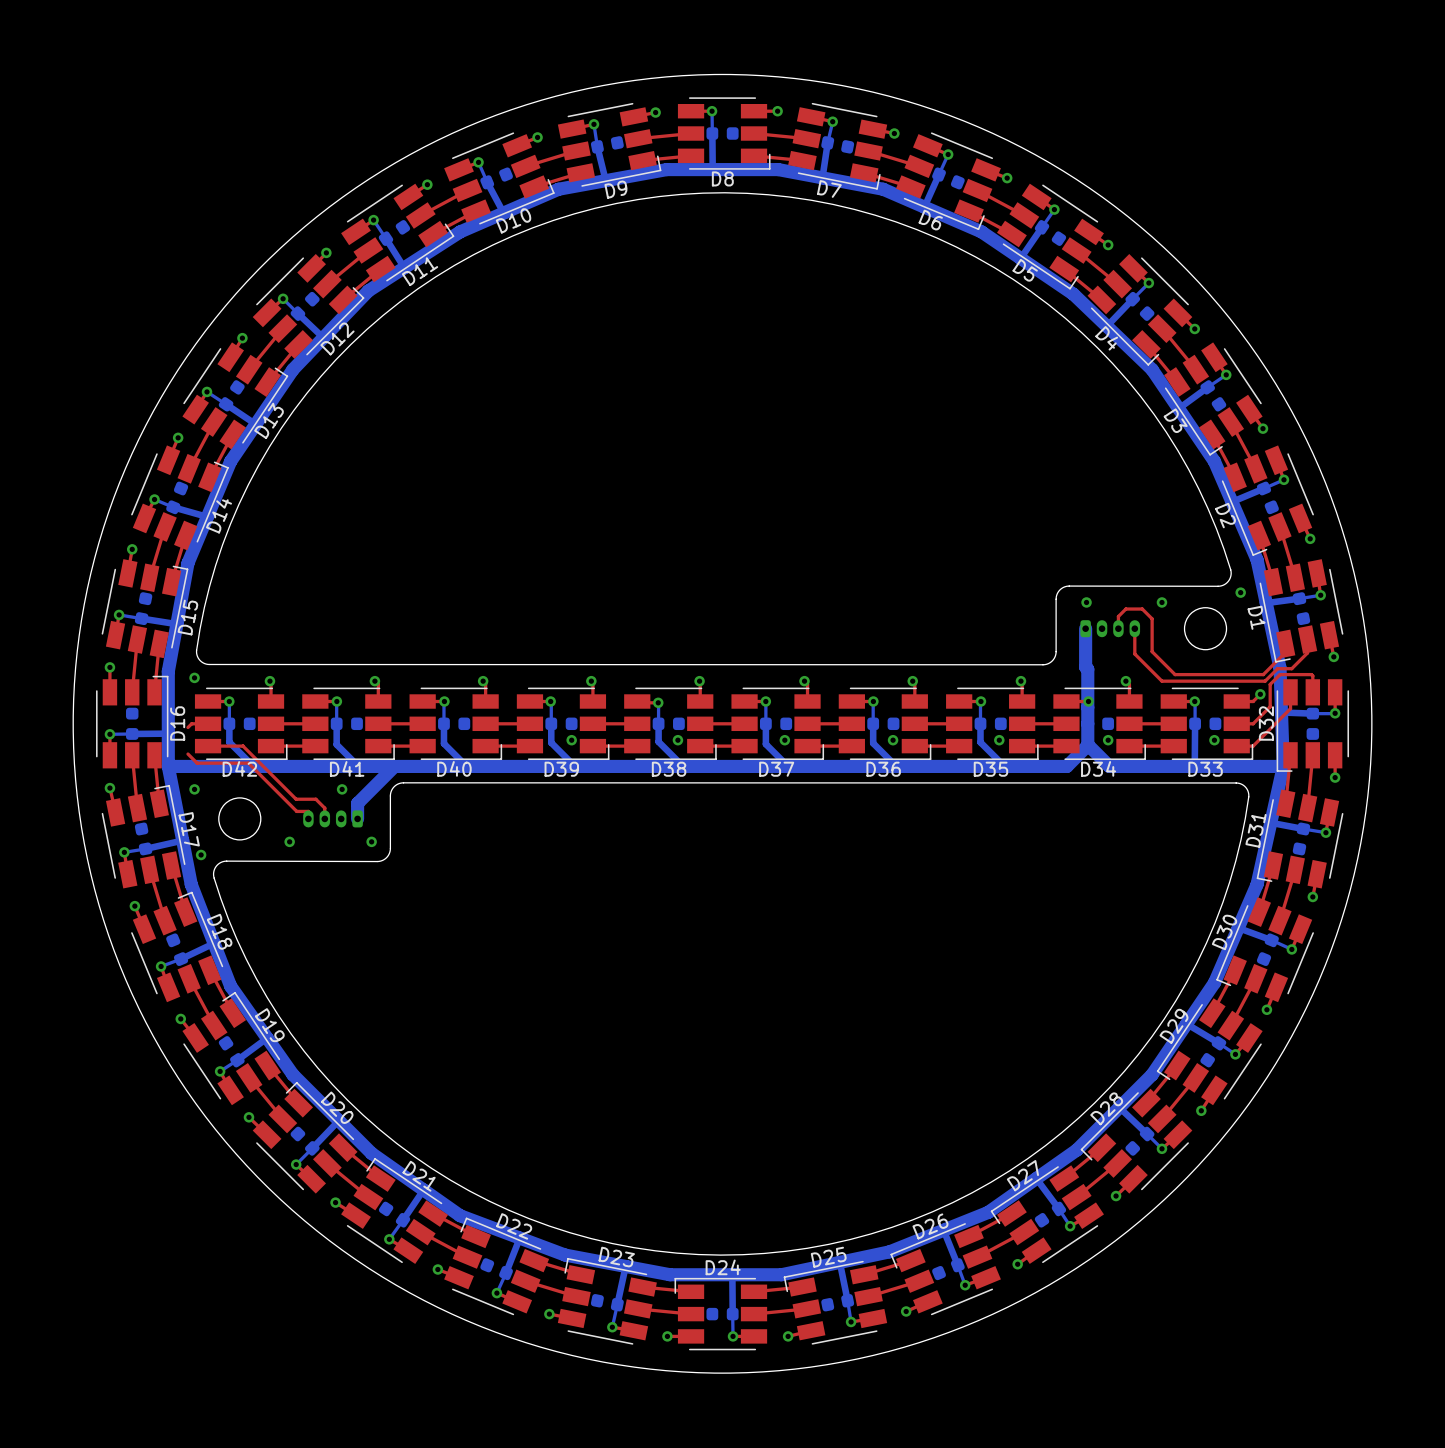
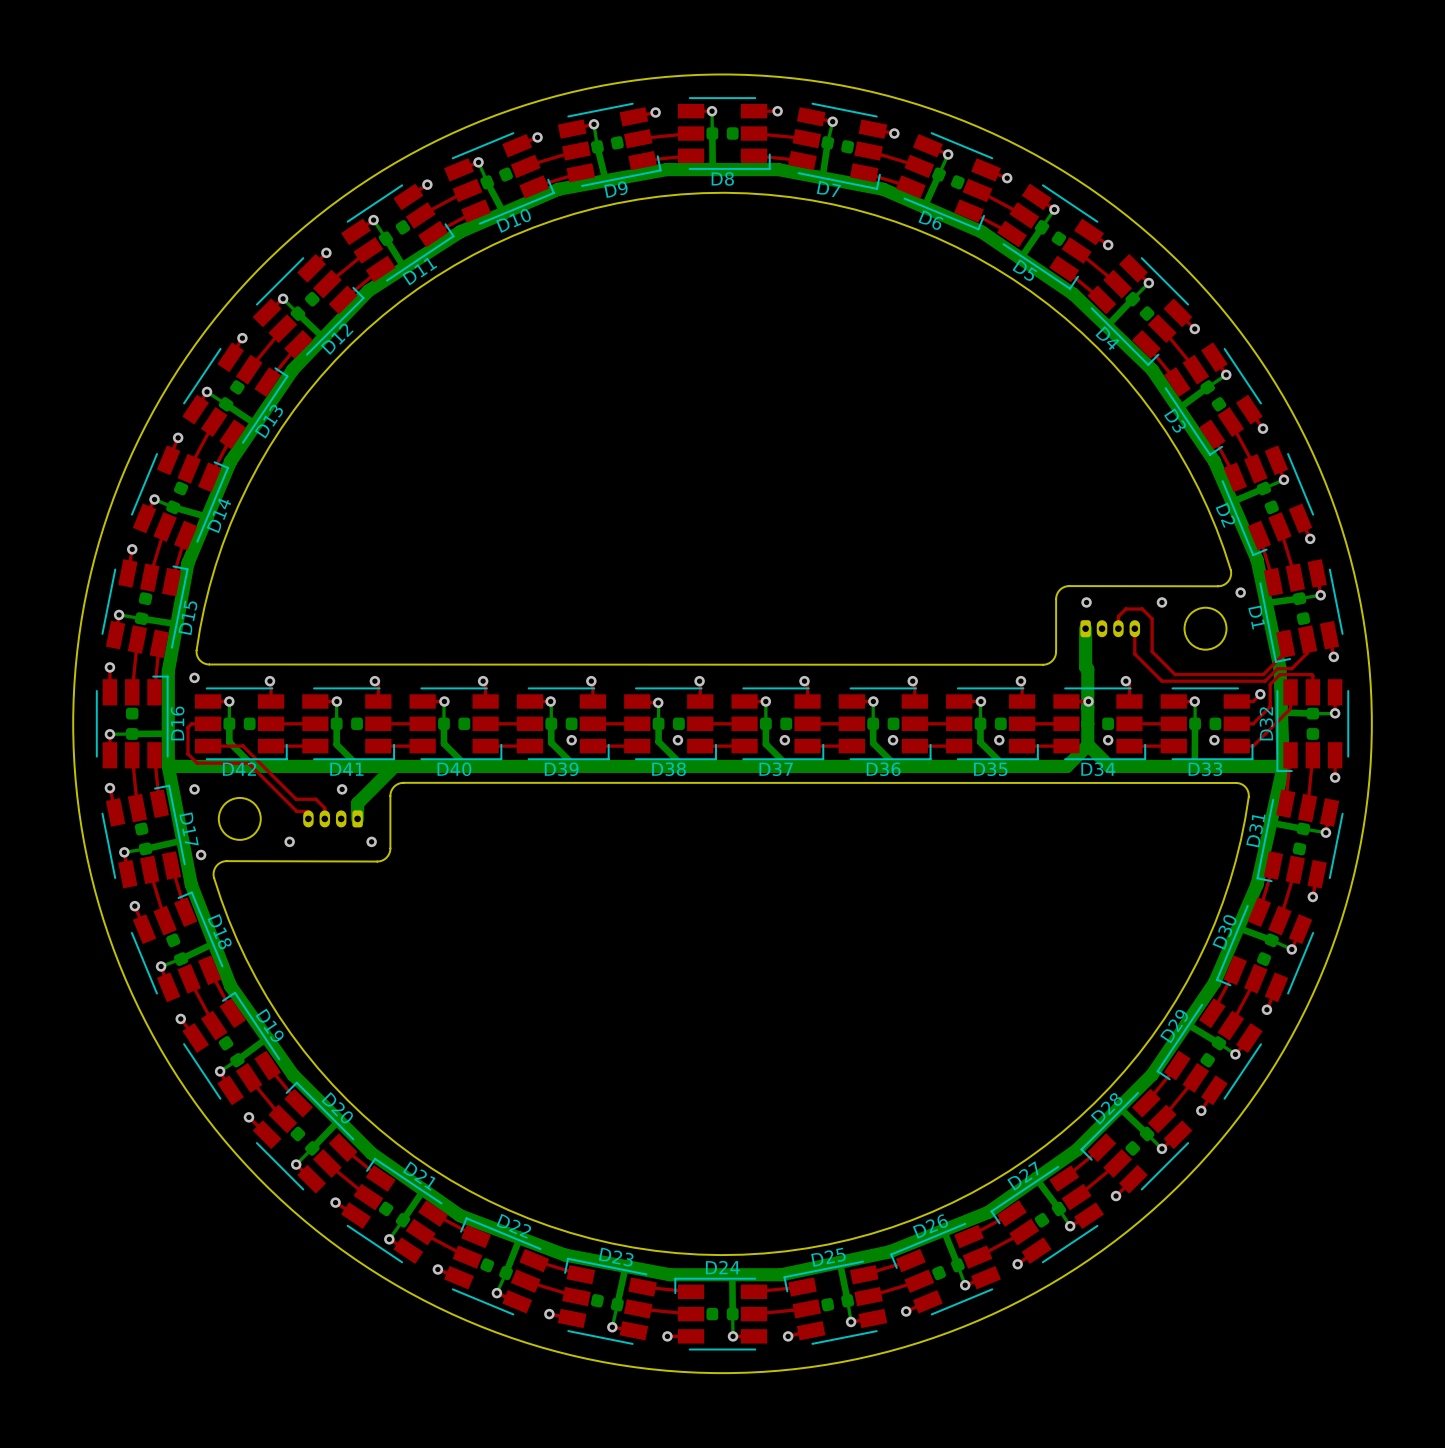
top track: none -> (187, 727) (187, 754)

